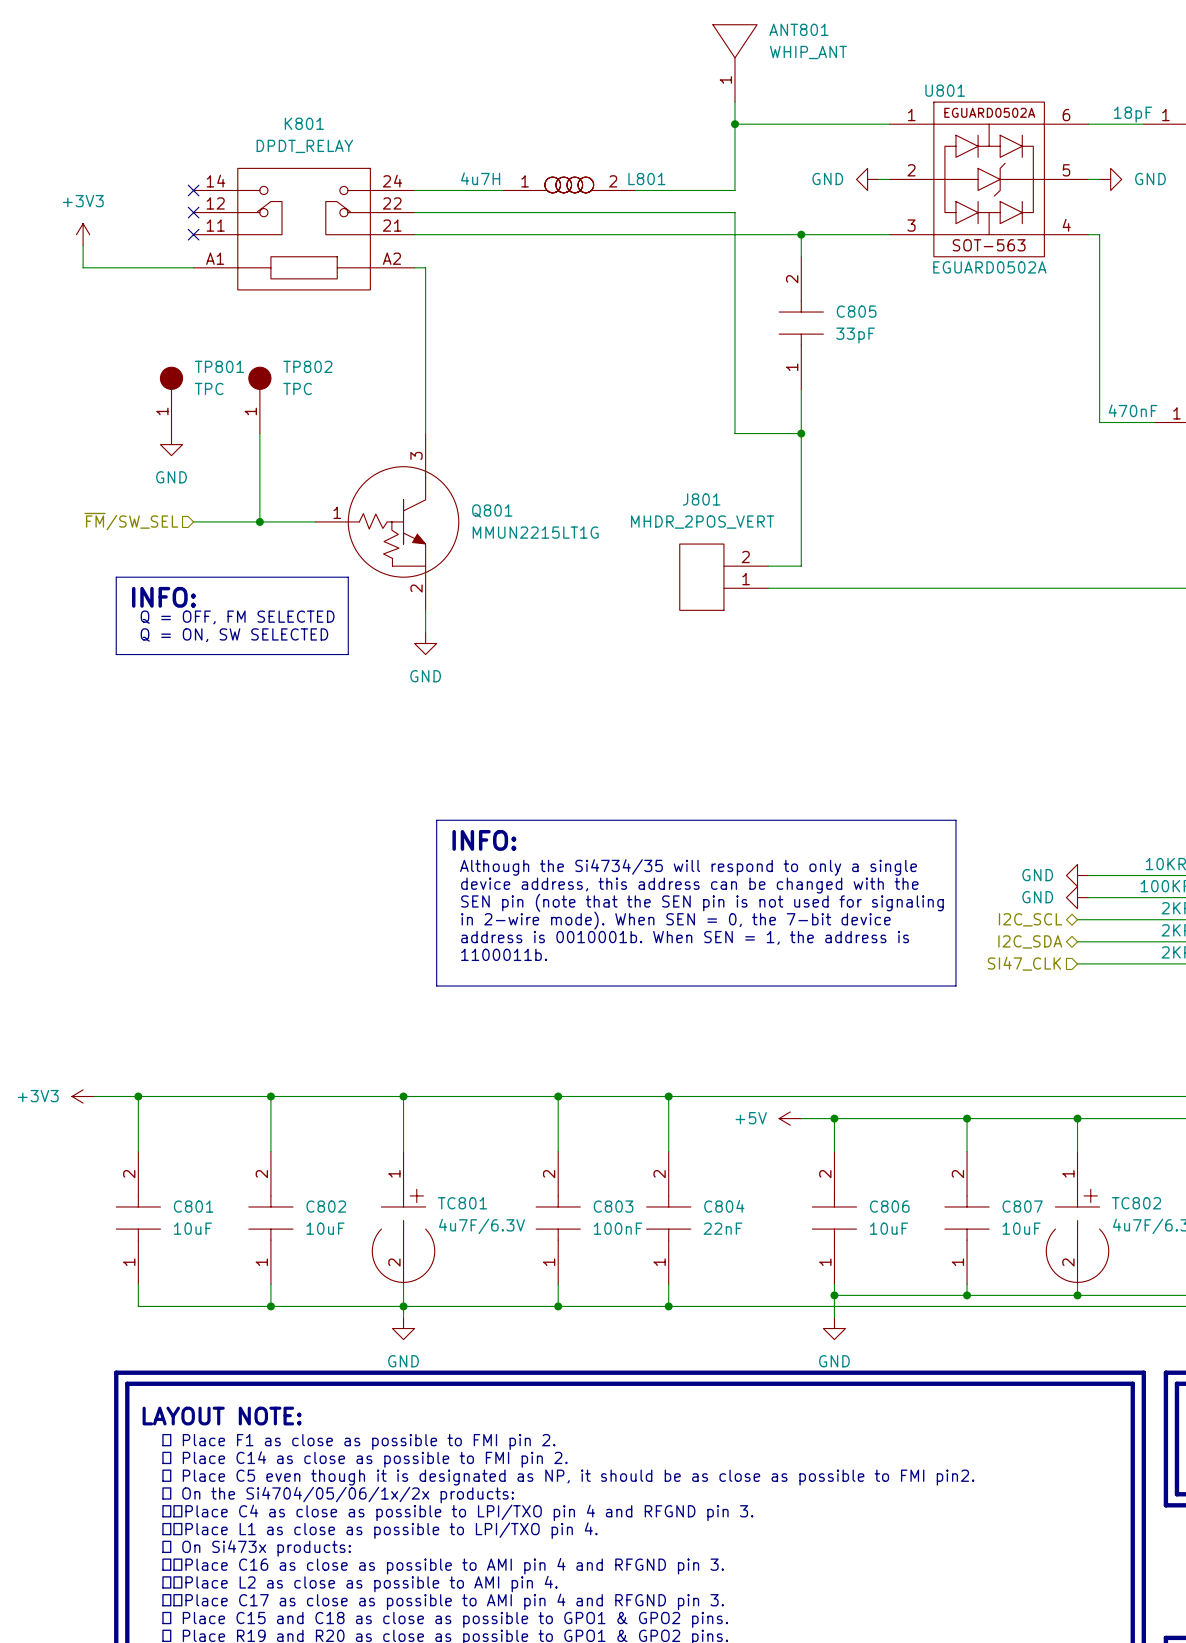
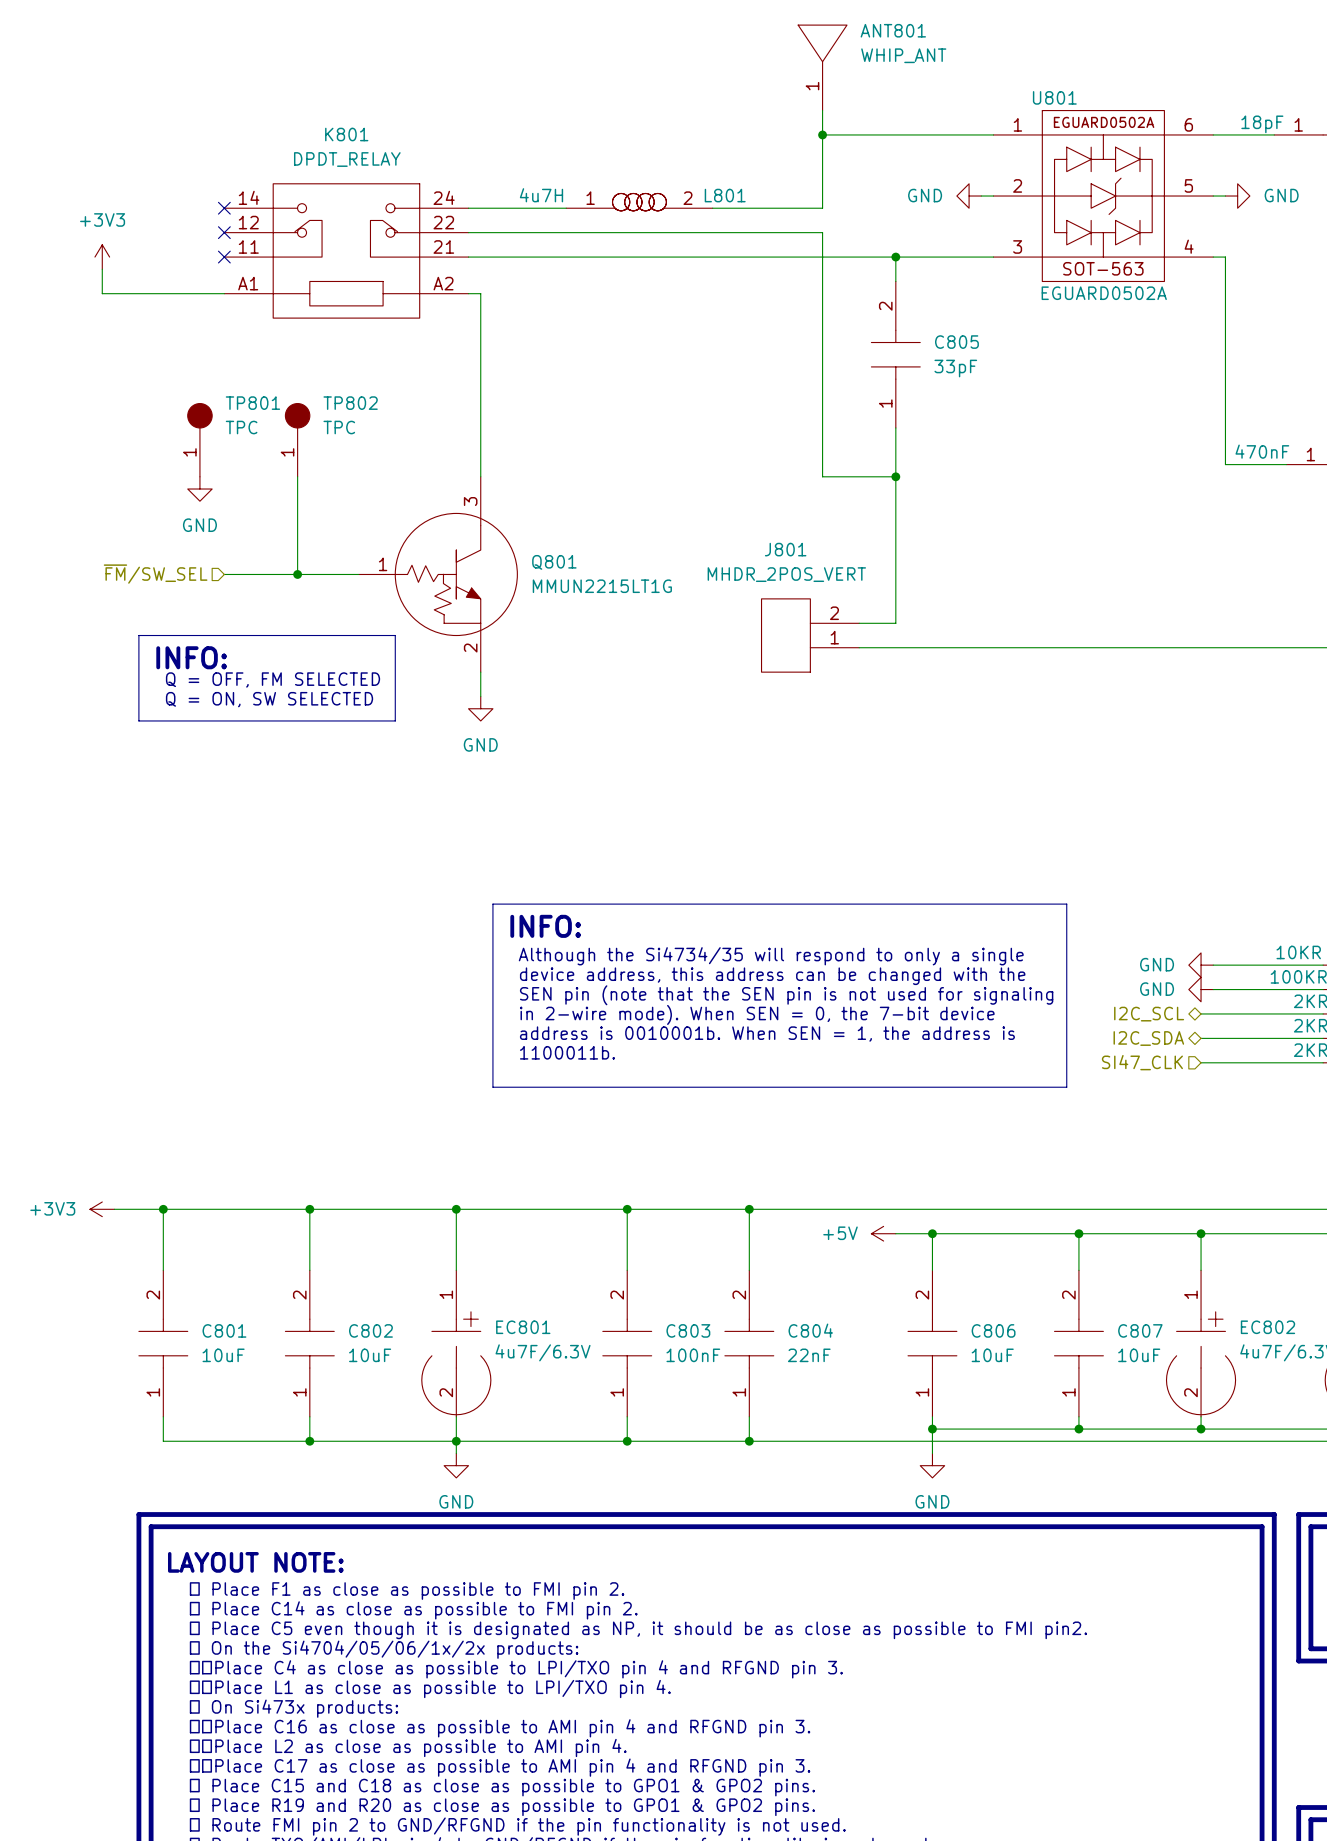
TC801 name: TC801 (462, 1203) -> EC801 (523, 1327)
TC802 name: TC802 (1136, 1203) -> EC802 (1267, 1327)

